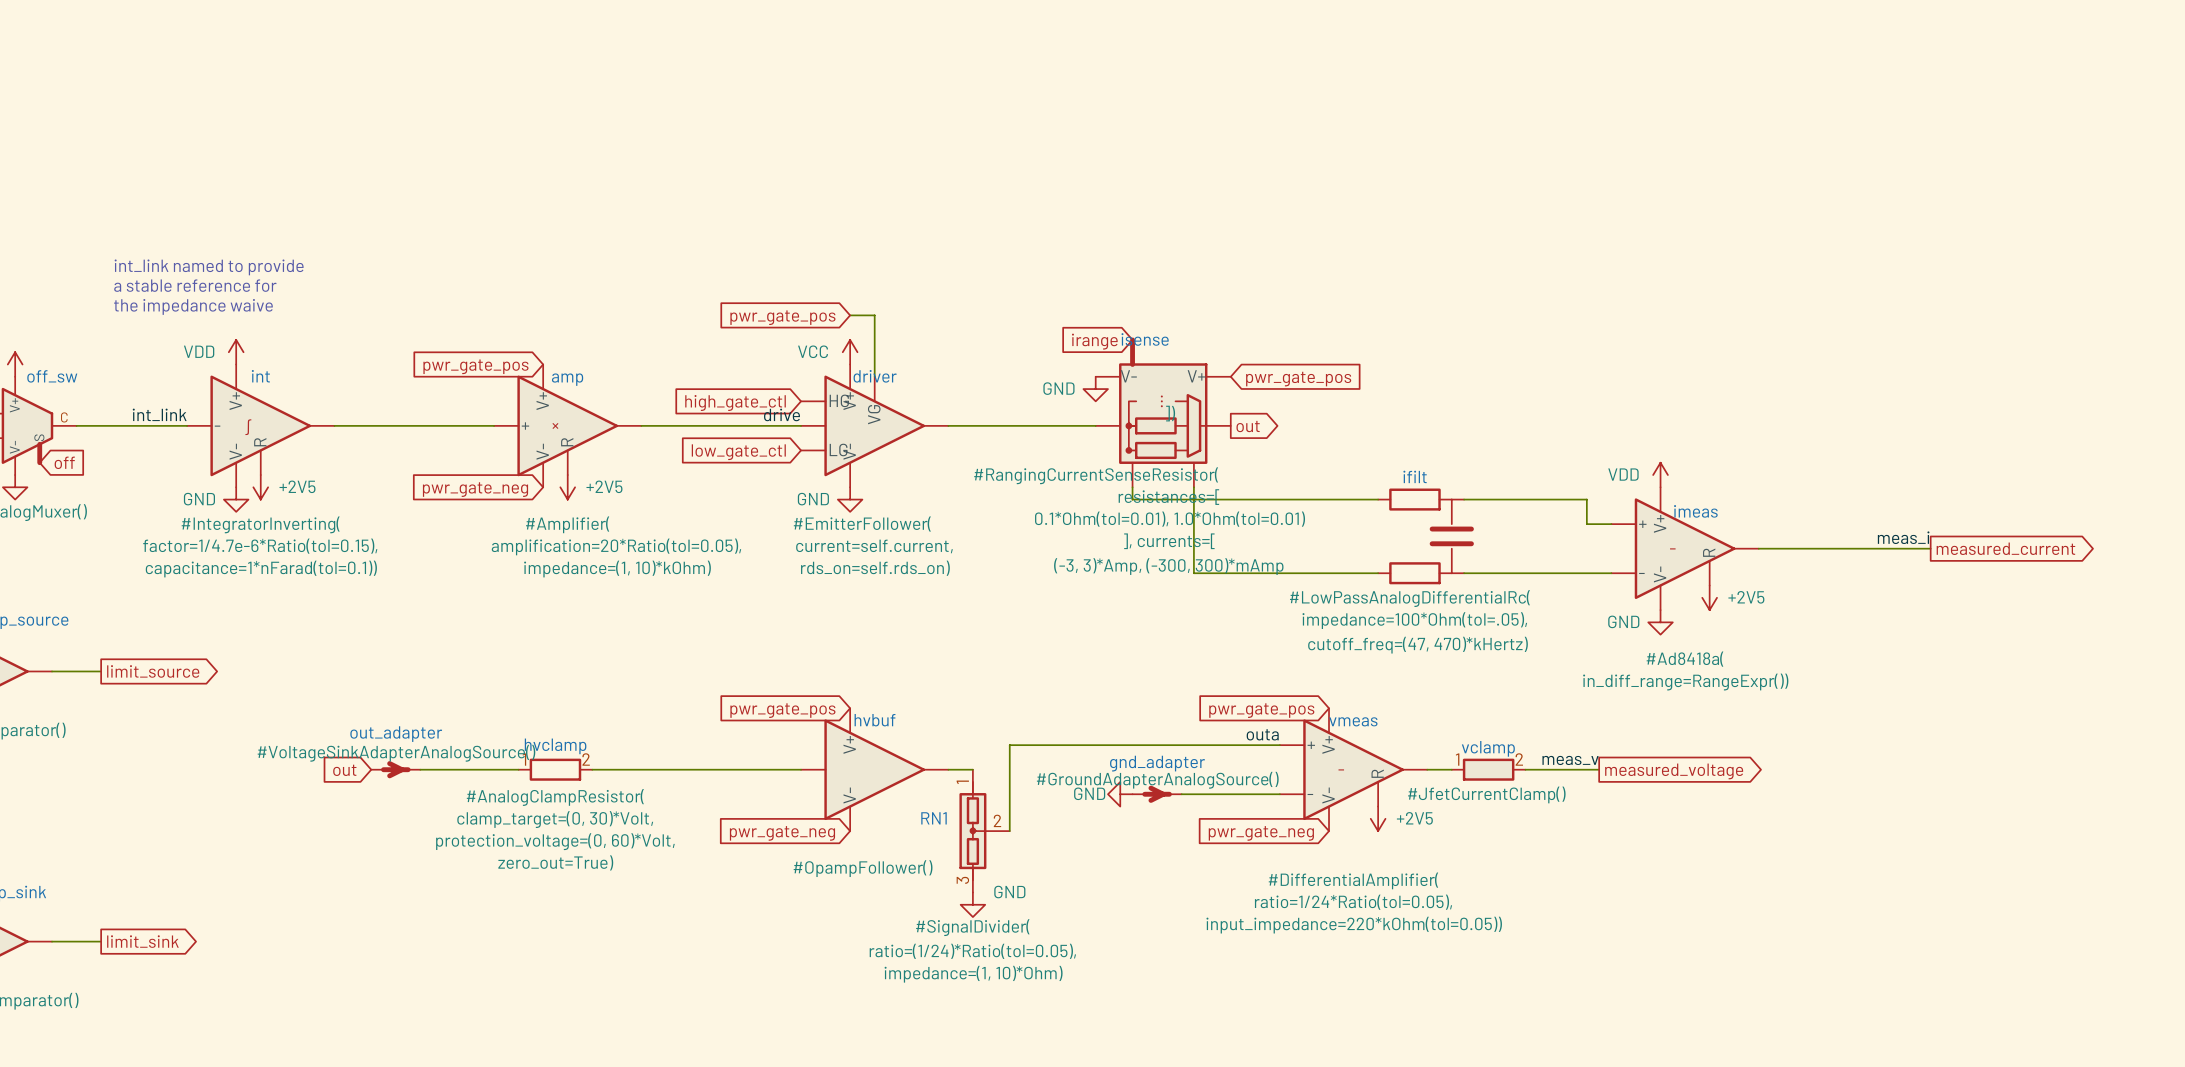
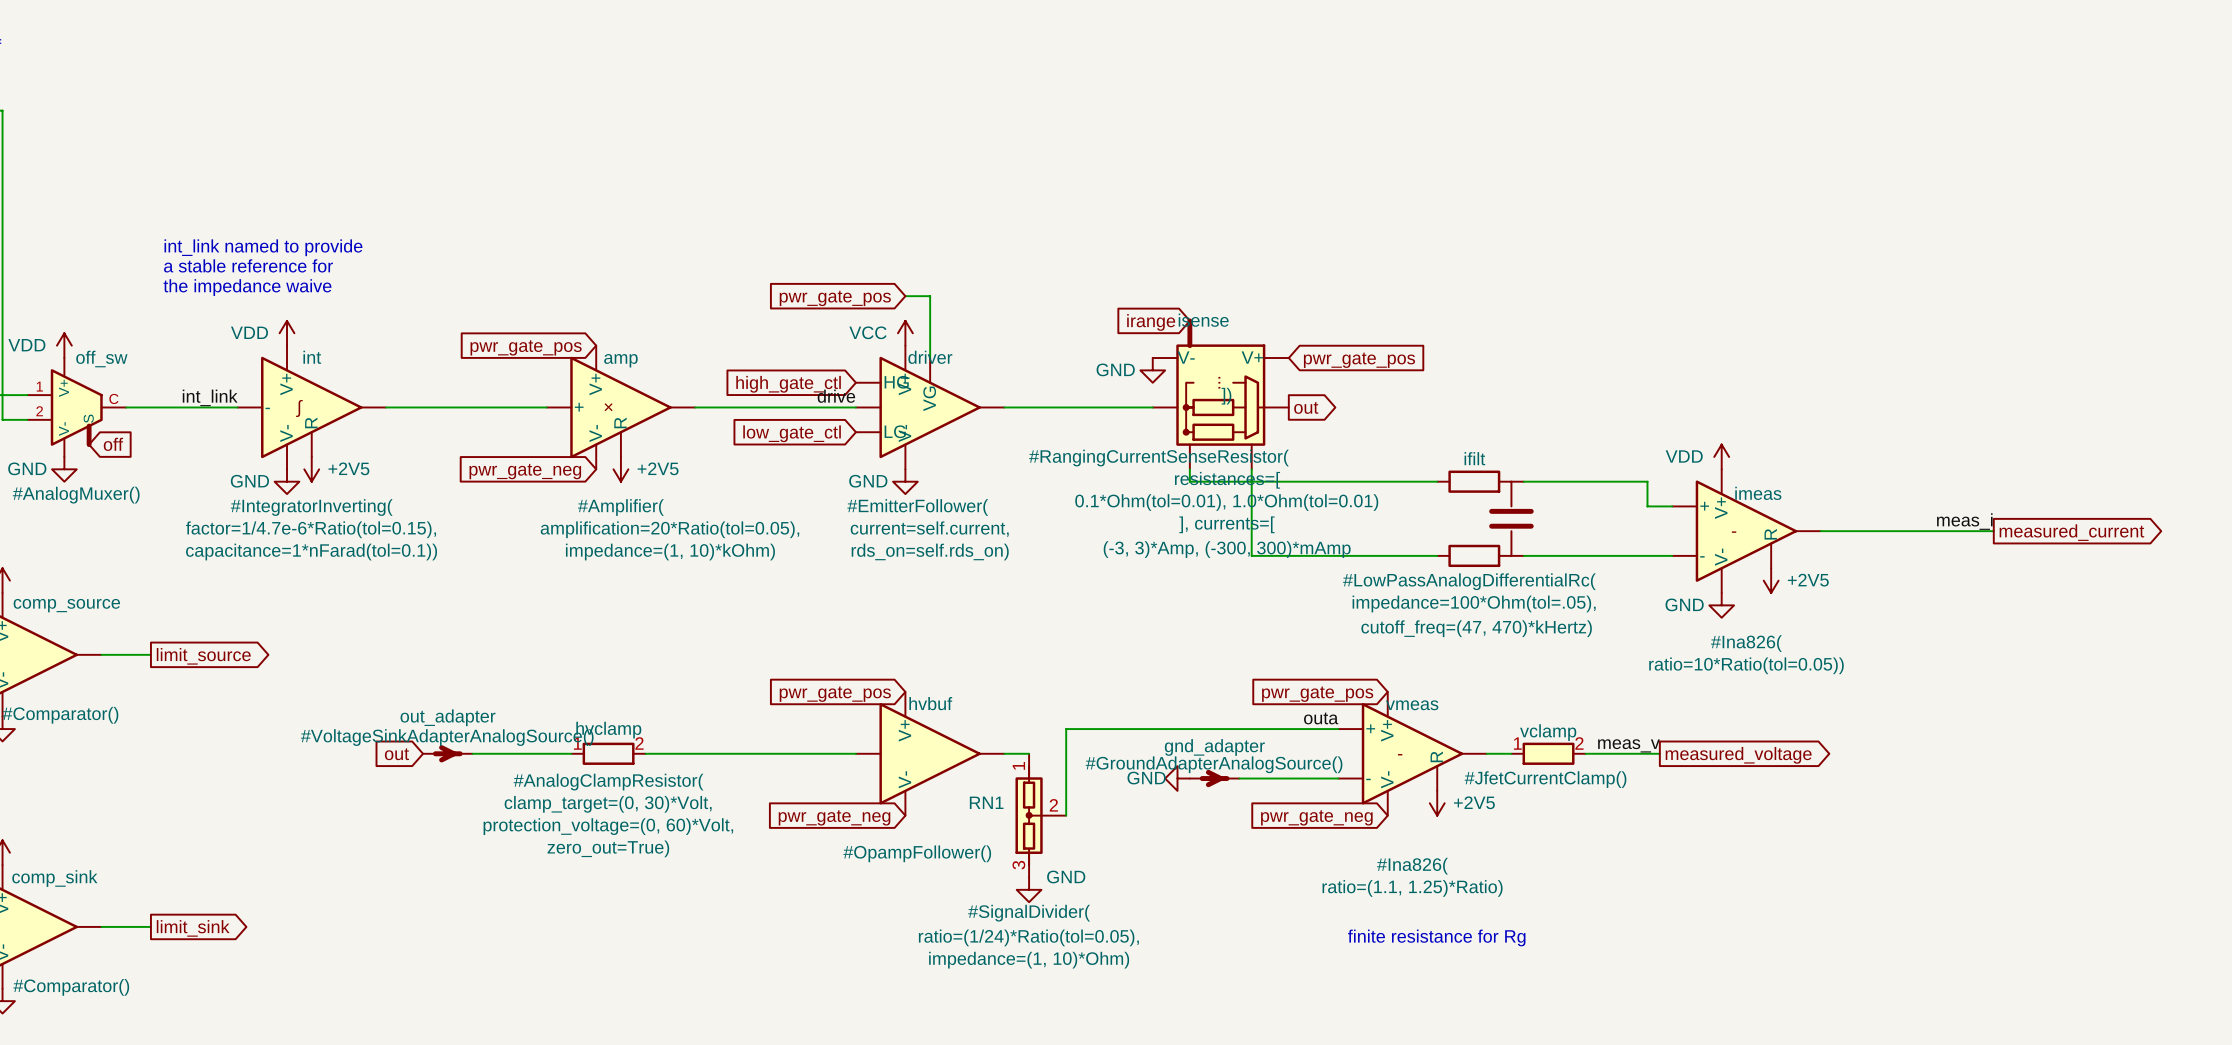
imeas value: #Ad8418a( (1684, 659) -> #Ina826( (1746, 643)
imeas text: in_diff_range=RangeExpr()) (1685, 682) -> ratio=10*Ratio(tol=0.05)) (1746, 665)
vmeas value: #DifferentialAmplifier( (1353, 880) -> #Ina826( (1412, 866)
vmeas text: ratio=1/24*Ratio(tol=0.05), (1353, 902) -> ratio=(1.1, 1.25)*Ratio) (1412, 888)
vmeas text: input_impedance=220*kOhm(tol=0.05)) (1354, 925) -> none
text: none -> finite resistance for Rg (1436, 937)

